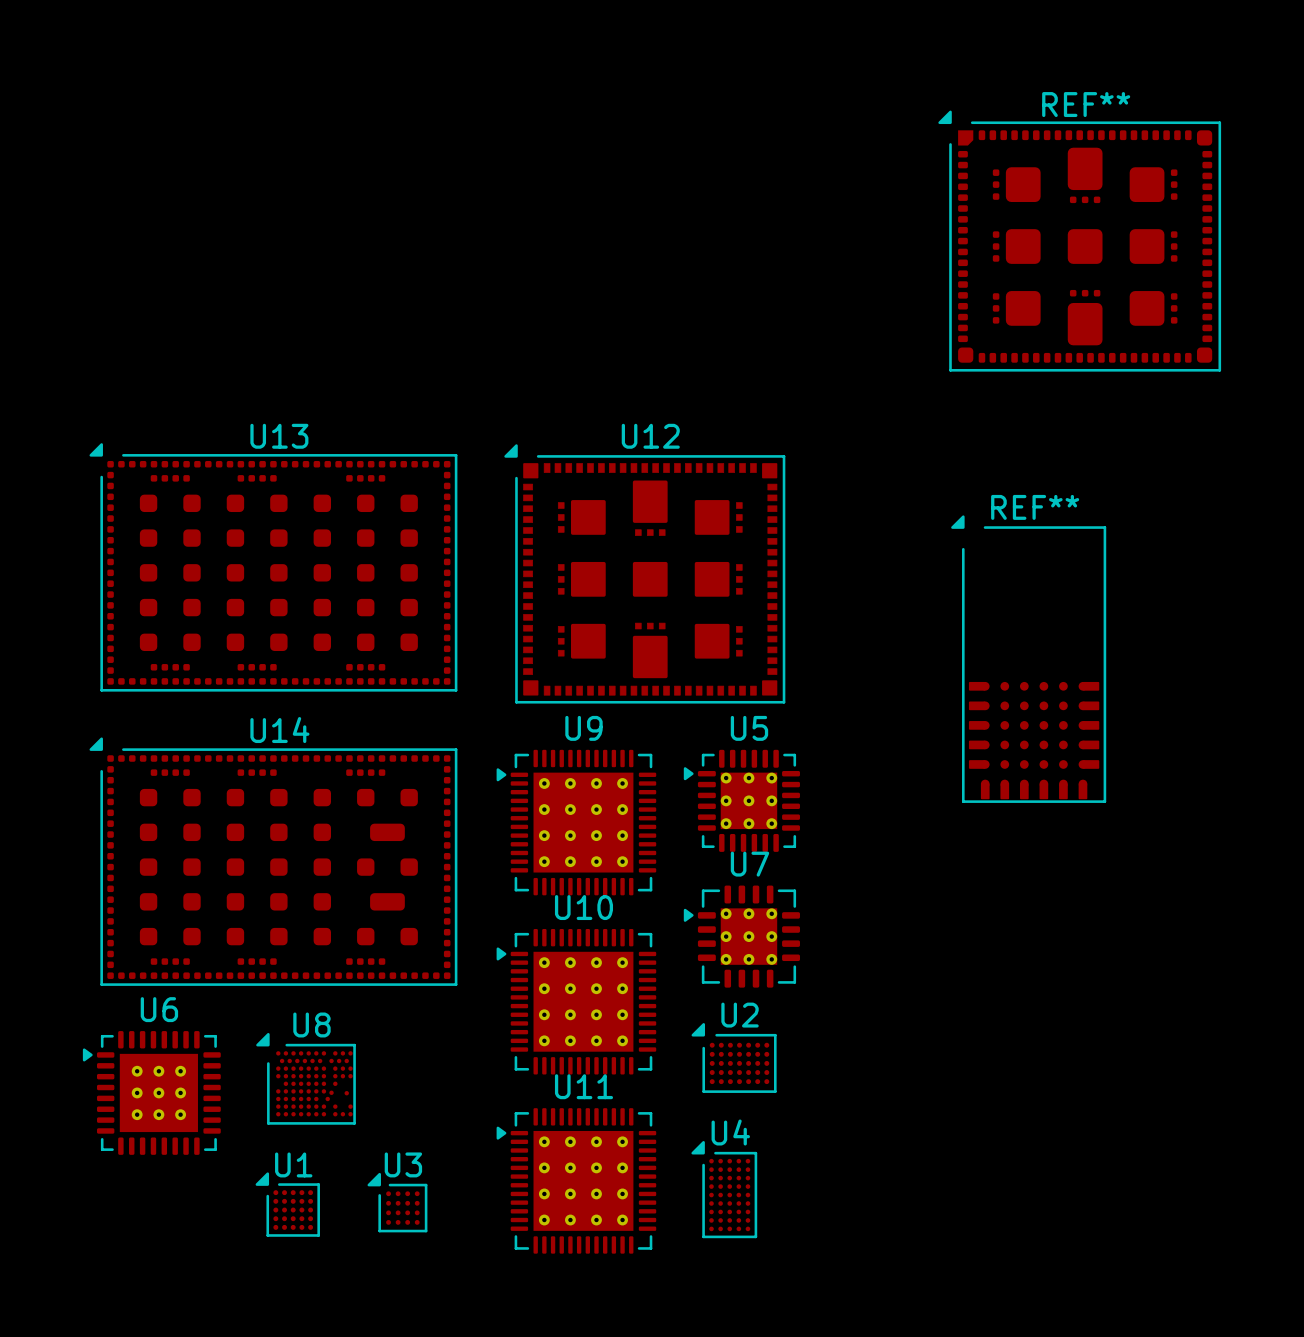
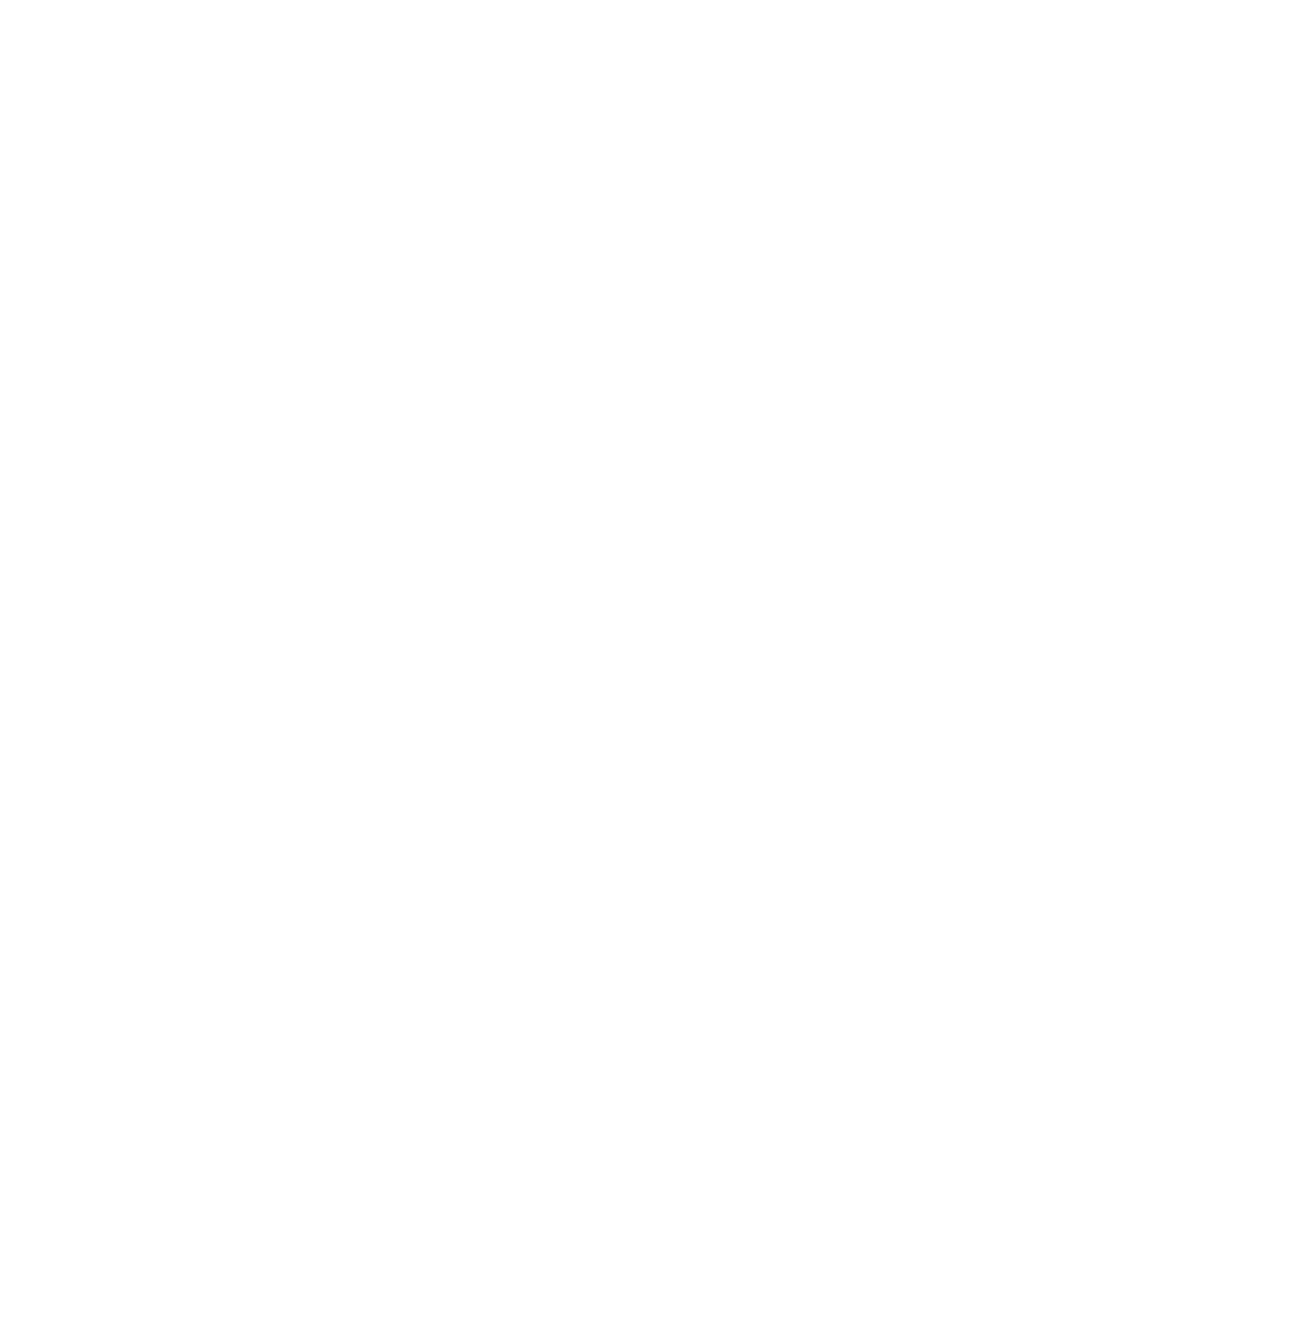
REF**: (1079, 241) -> none
U13: (273, 567) -> none
U12: (644, 573) -> none
REF**: (1028, 659) -> none
U5: (741, 800) -> none
U9: (576, 822) -> none
U14: (273, 861) -> none
U7: (741, 936) -> none
U10: (576, 1001) -> none
U2: (734, 1057) -> none
U8: (306, 1078) -> none
U6: (151, 1092) -> none
U11: (576, 1180) -> none
U4: (724, 1189) -> none
U3: (397, 1202) -> none
U1: (287, 1204) -> none

